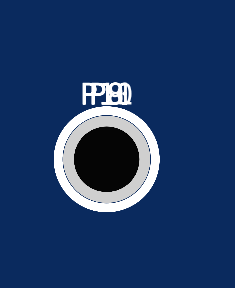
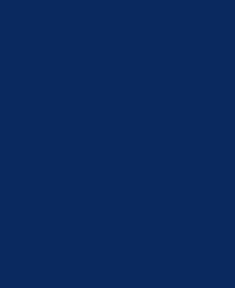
part: (106, 159) -> none
part: (106, 159) -> none
part: (106, 159) -> none
part: (106, 159) -> none

